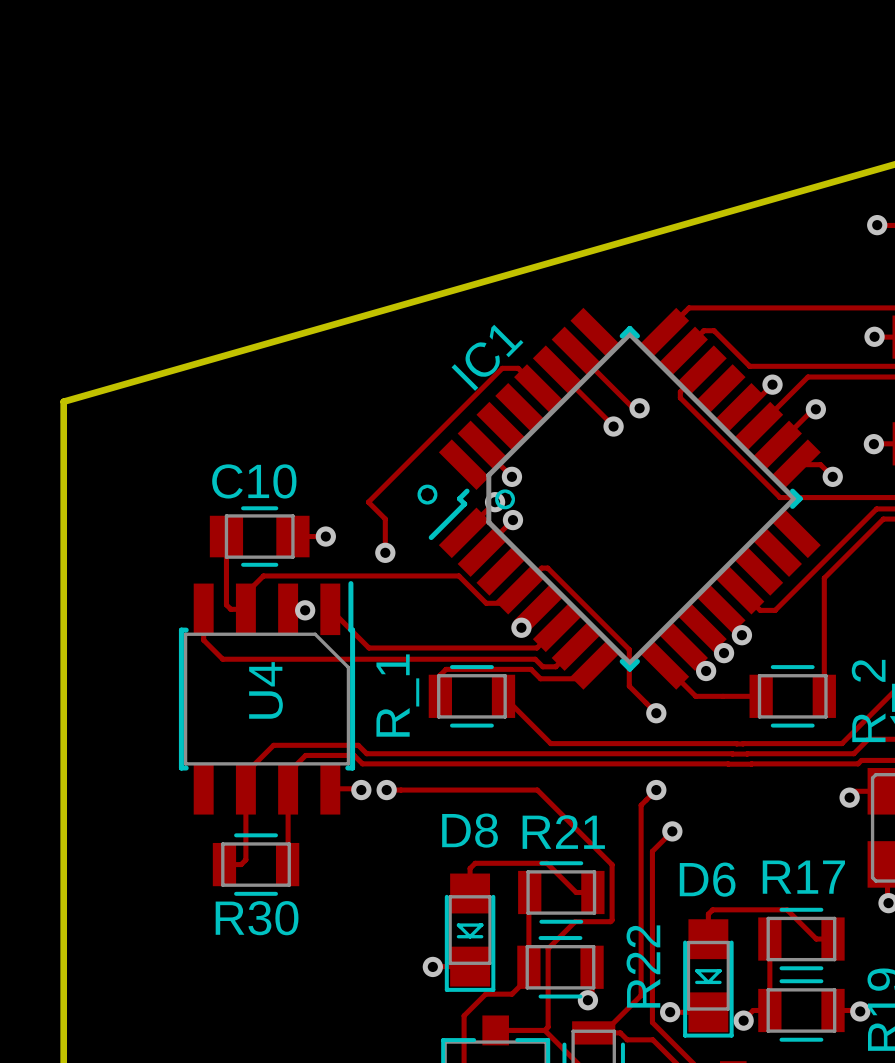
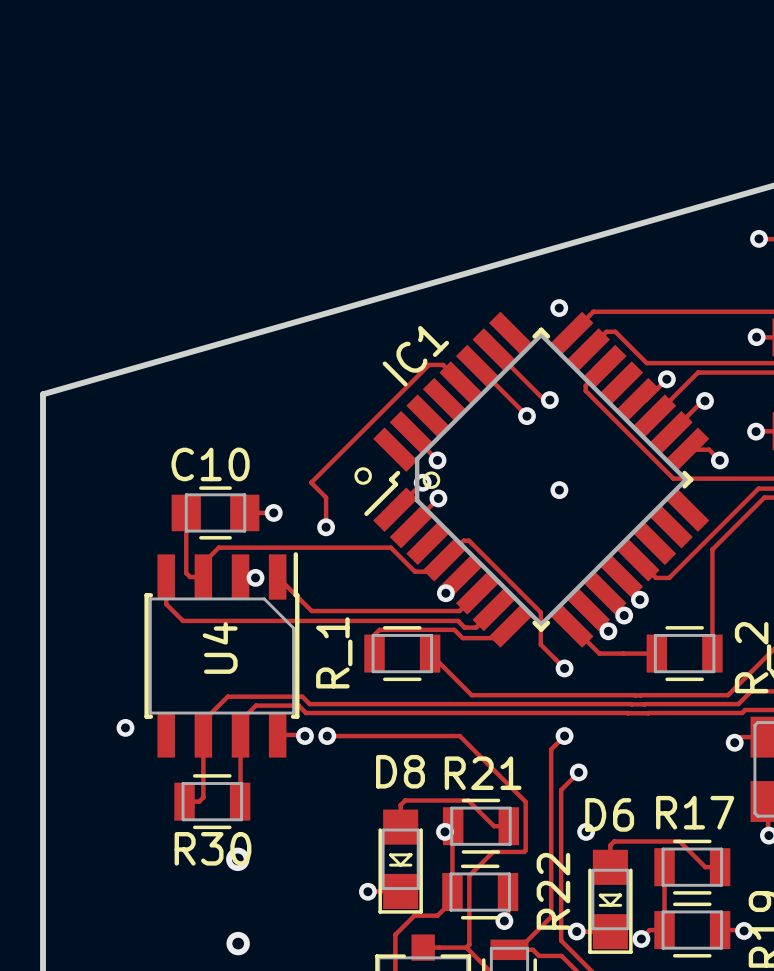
via: none -> (559, 308)
via: none -> (559, 490)
via: none -> (125, 727)
via: none -> (444, 831)
via: none -> (586, 831)
via: none -> (237, 859)
via: none -> (238, 943)

